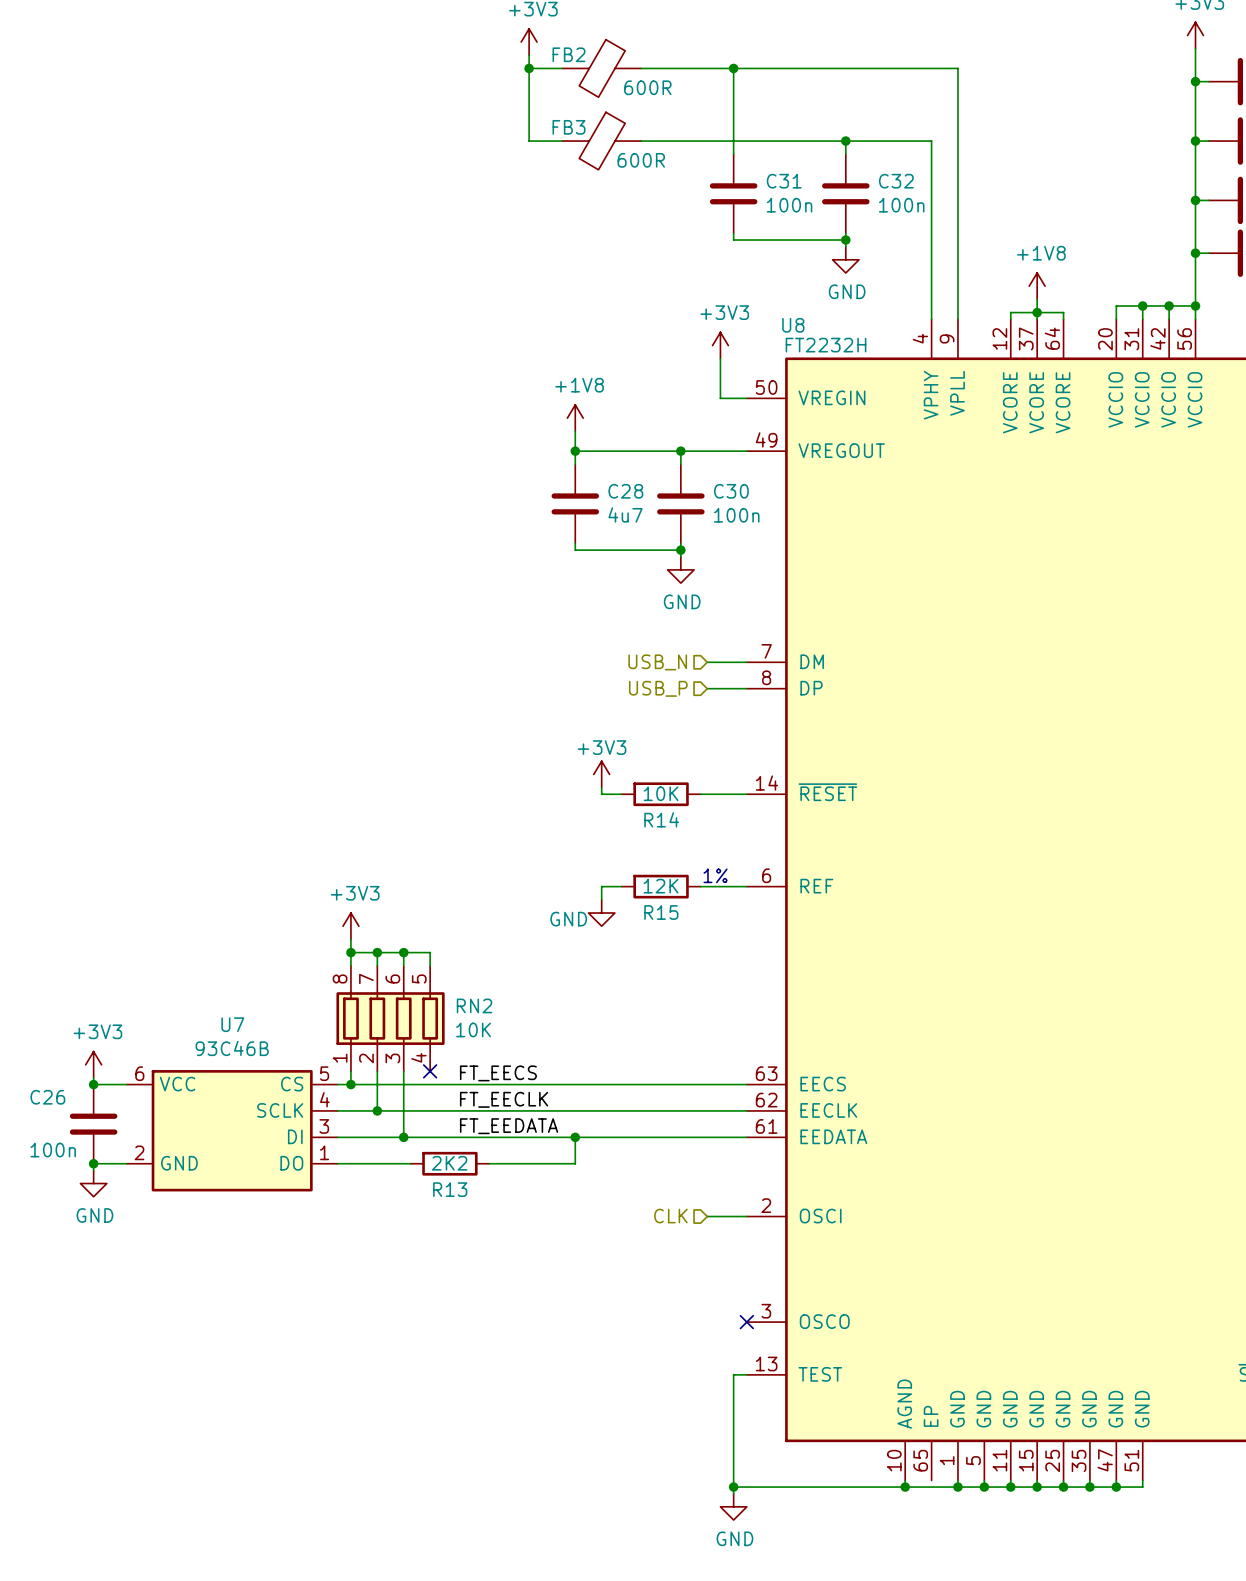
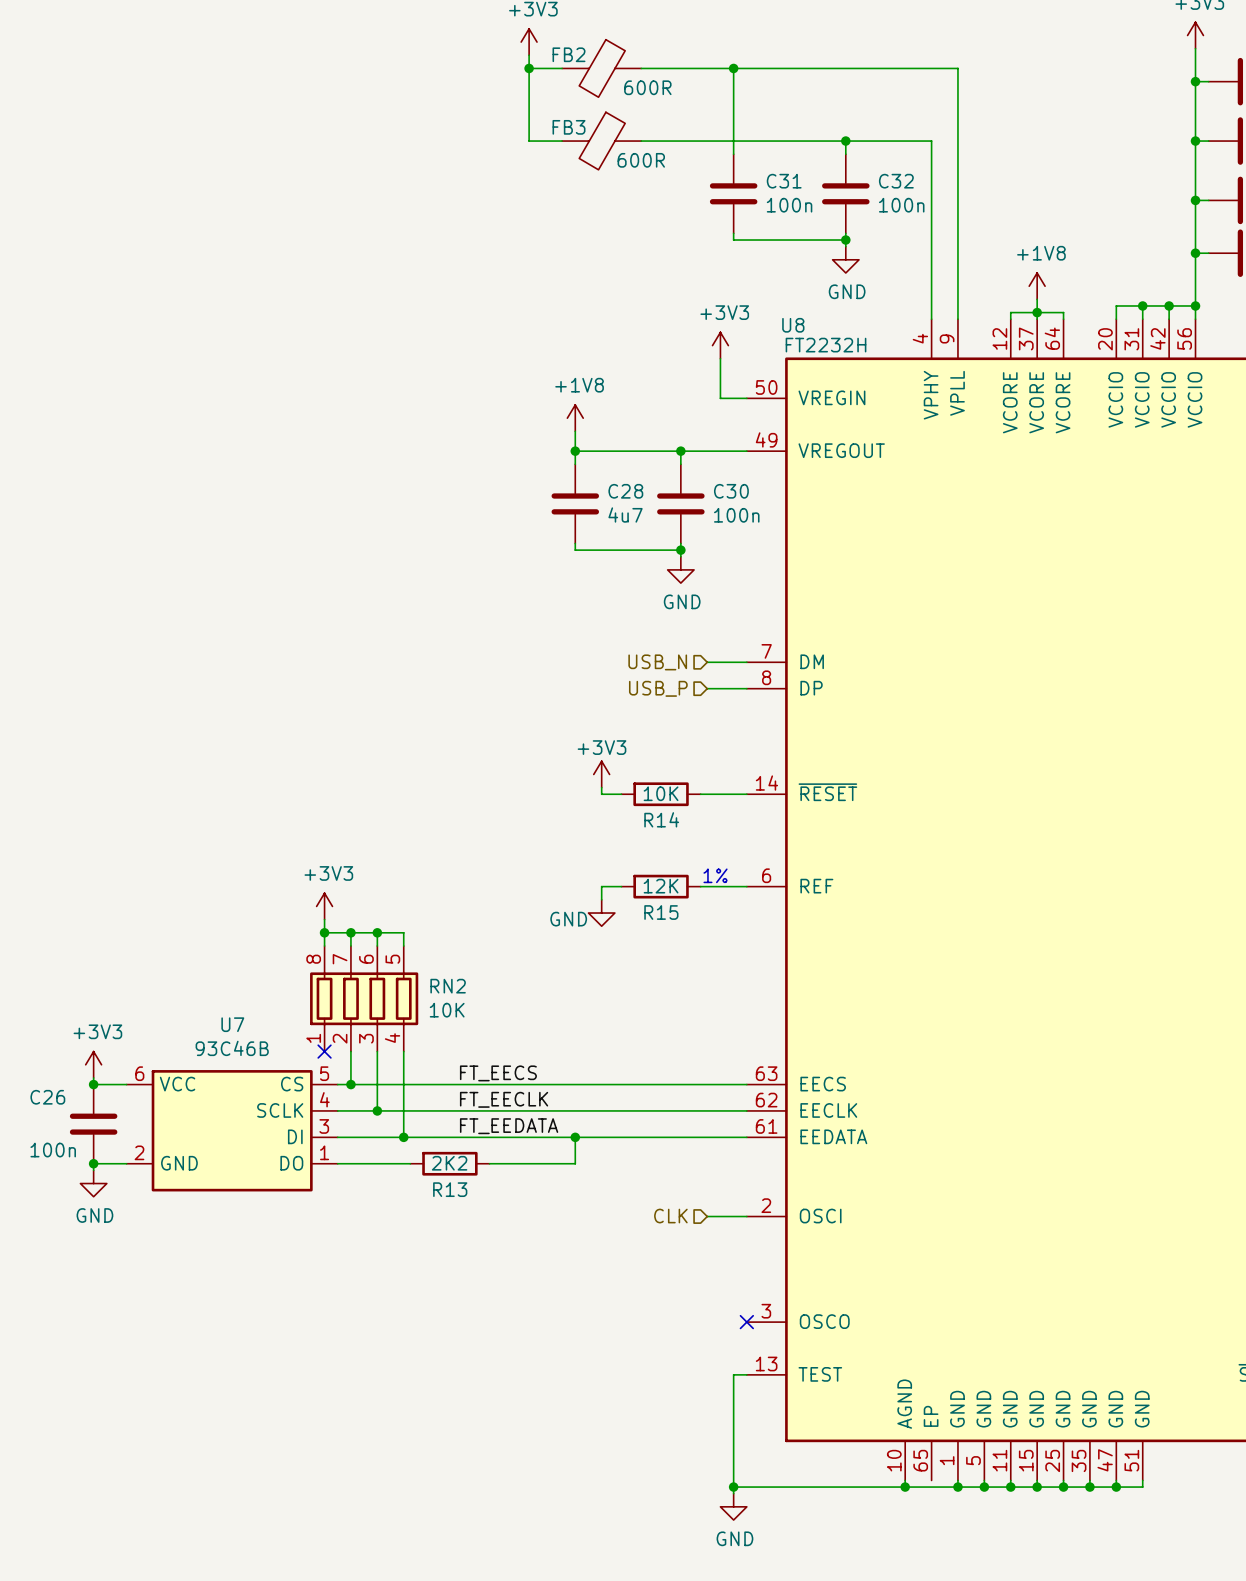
wire: none -> (324, 919) (324, 946)
power symbol position: +3V3 (350, 926) -> +3V3 (324, 906)
junction: none -> (324, 932)
junction: none -> (350, 932)
junction: none -> (377, 932)
wire: (350, 952) (430, 952) (430, 965) -> (324, 932) (403, 932) (403, 946)
junction: (350, 952) -> none
junction: (377, 952) -> none
junction: (403, 952) -> none
RN2 position: (390, 1018) -> (364, 998)
no-connect mark: none -> (324, 1051)
no-connect mark: (430, 1071) -> none

